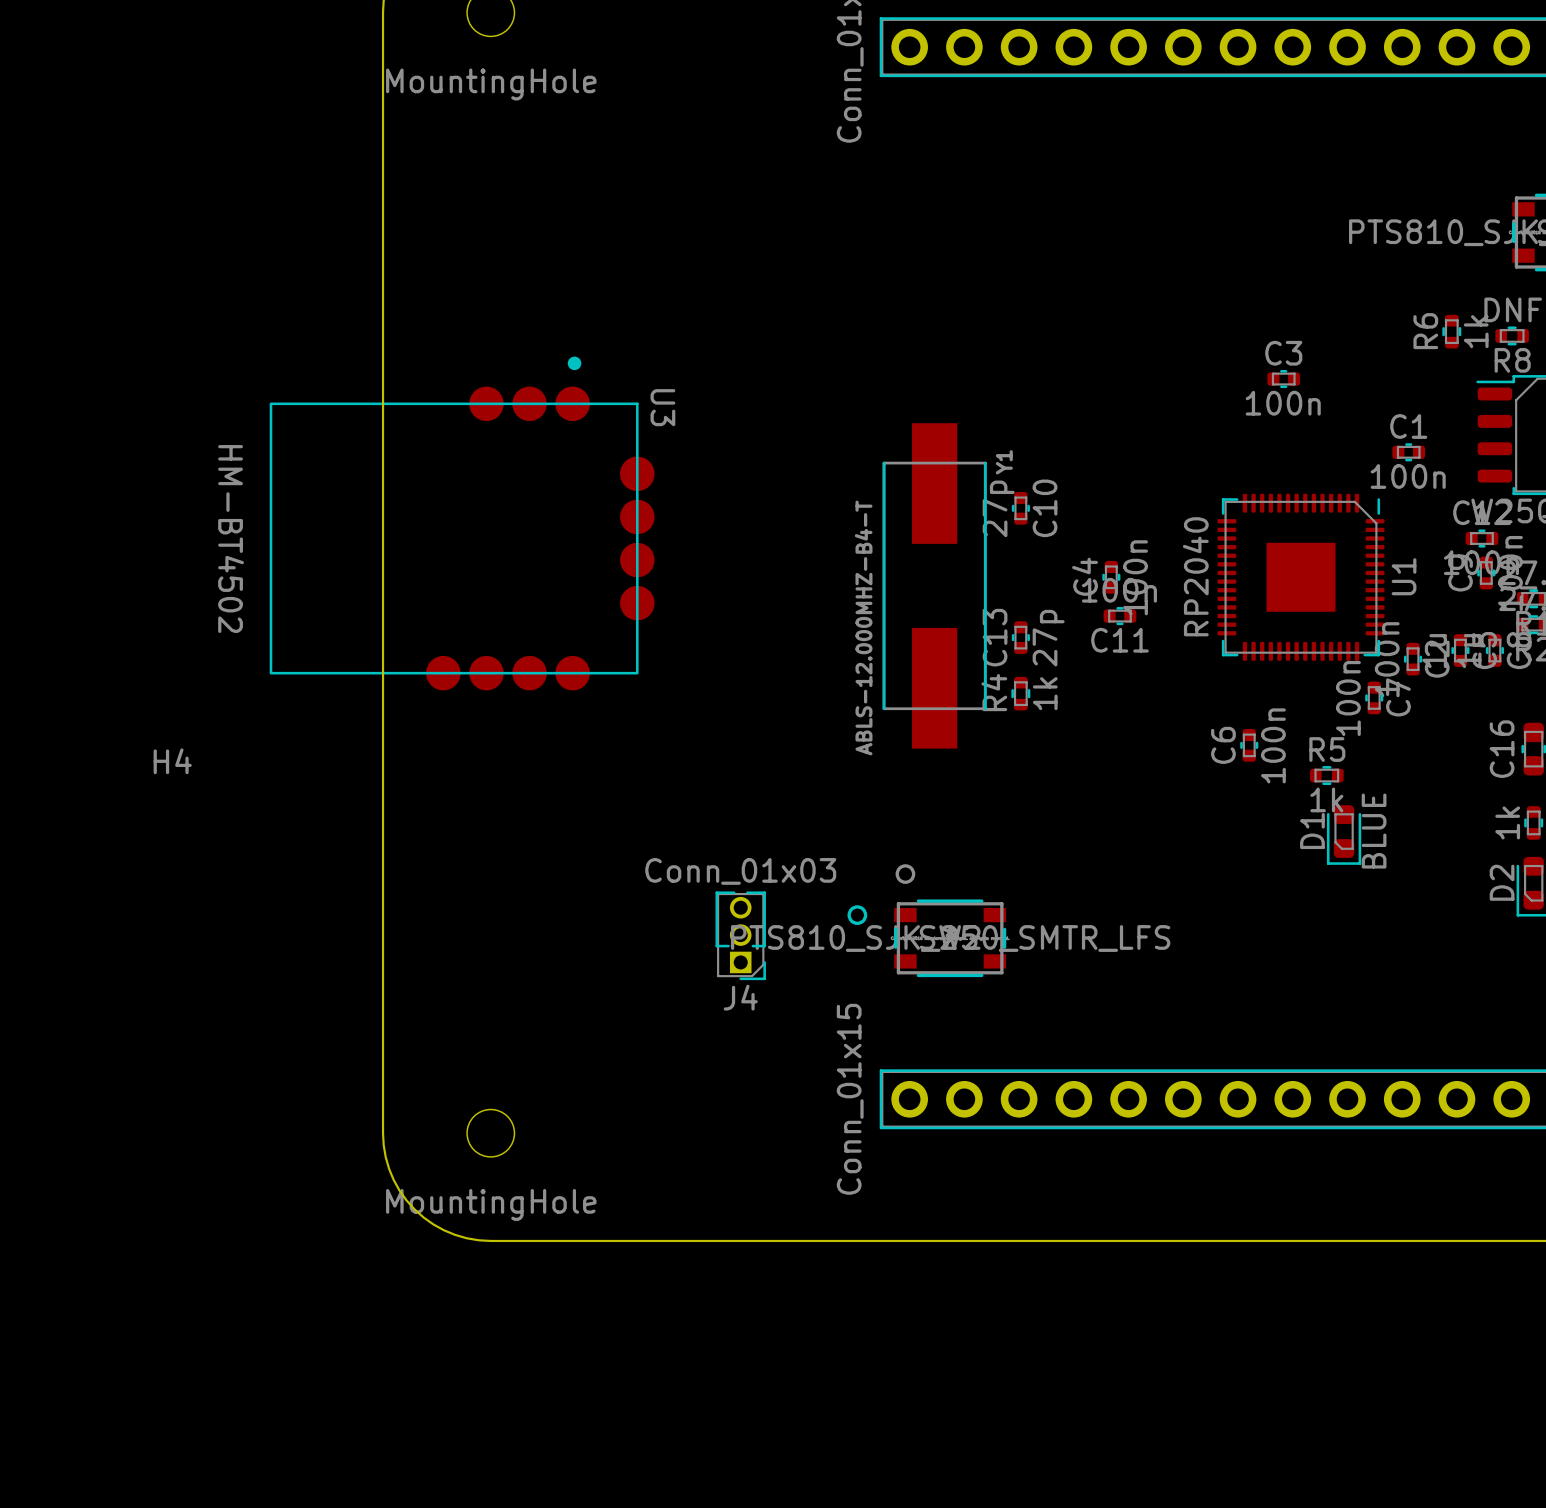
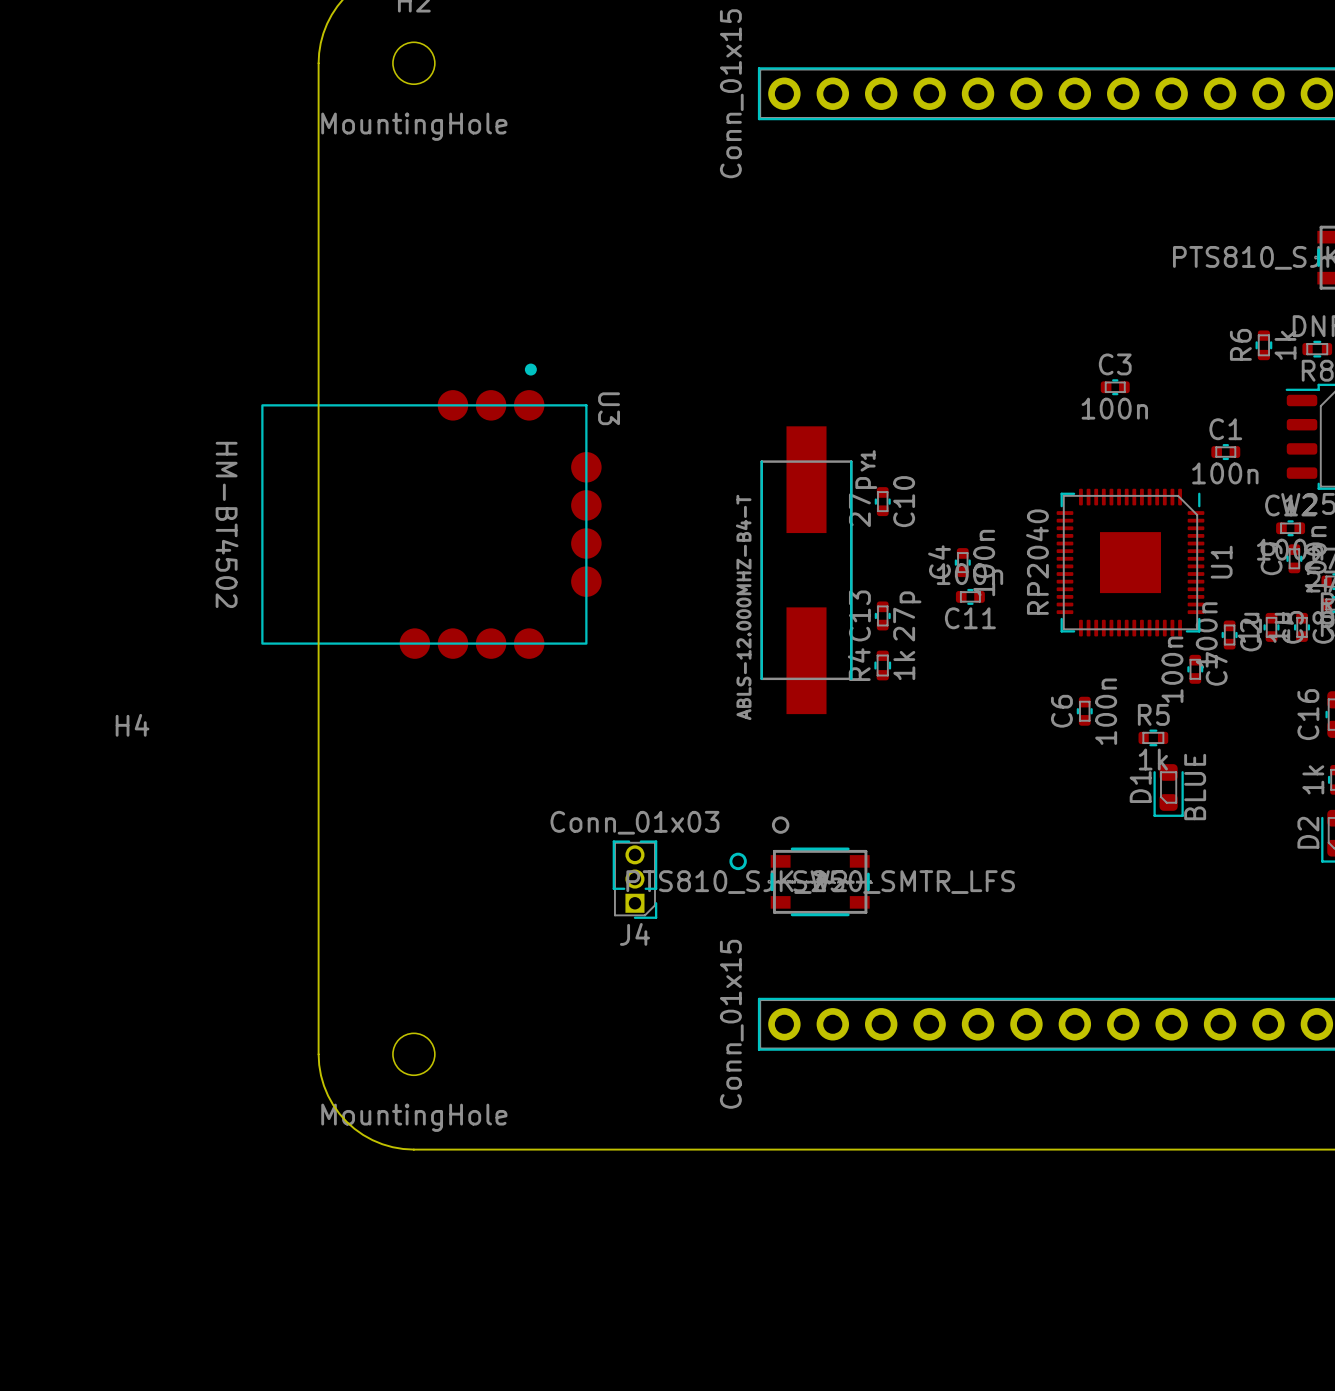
U3 position: (462, 523) -> (431, 511)

